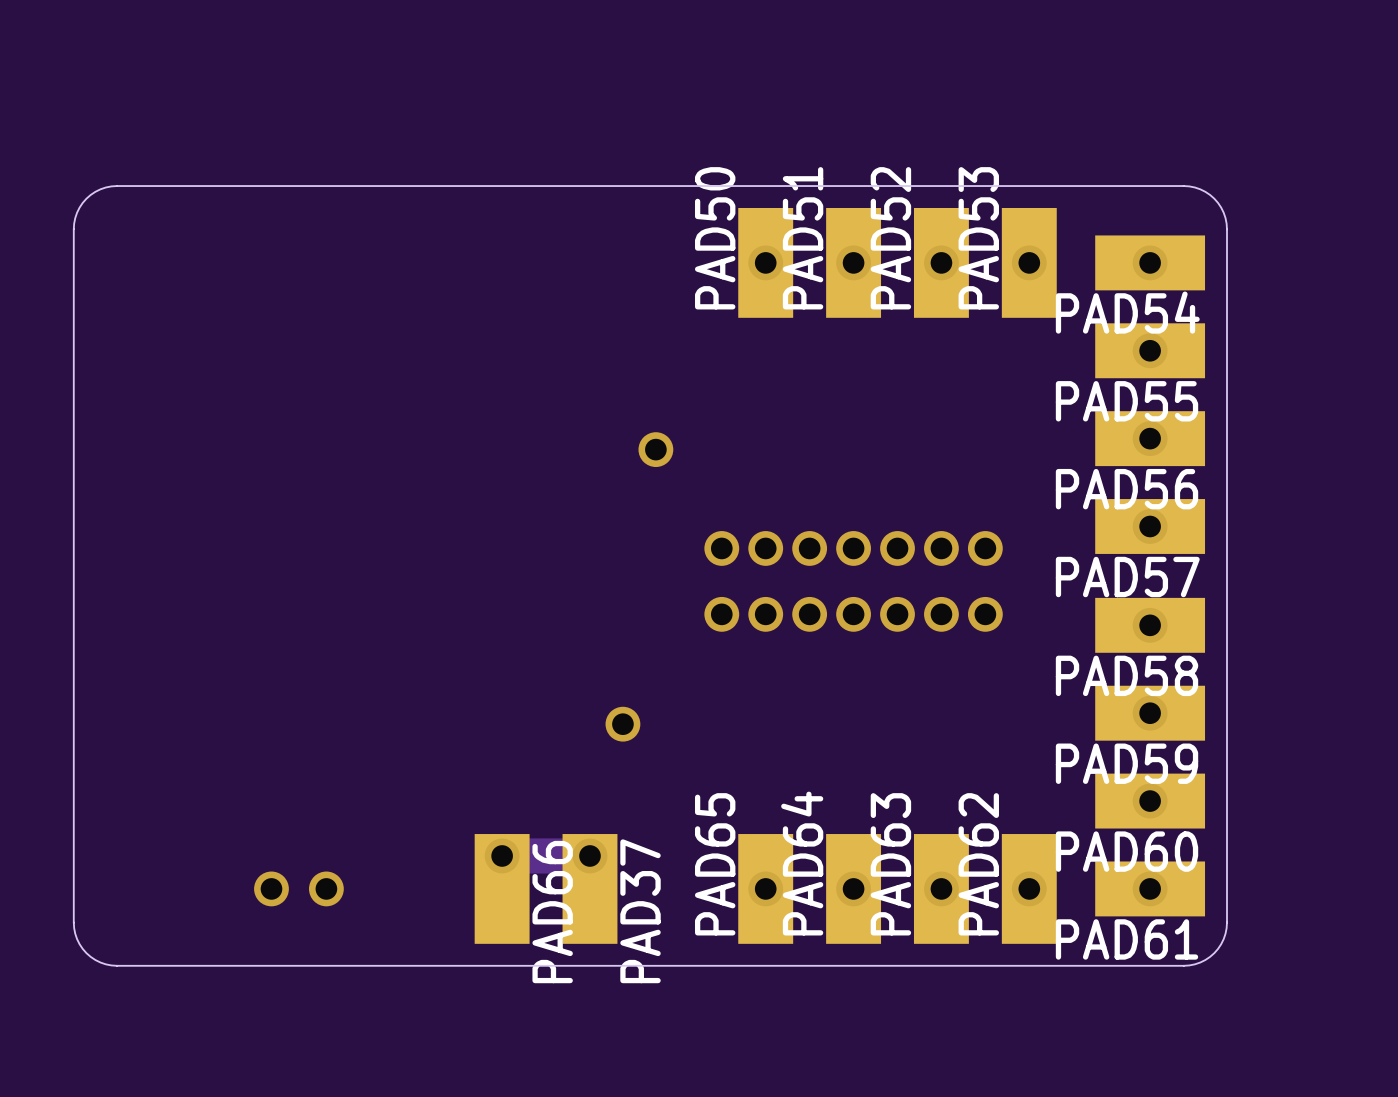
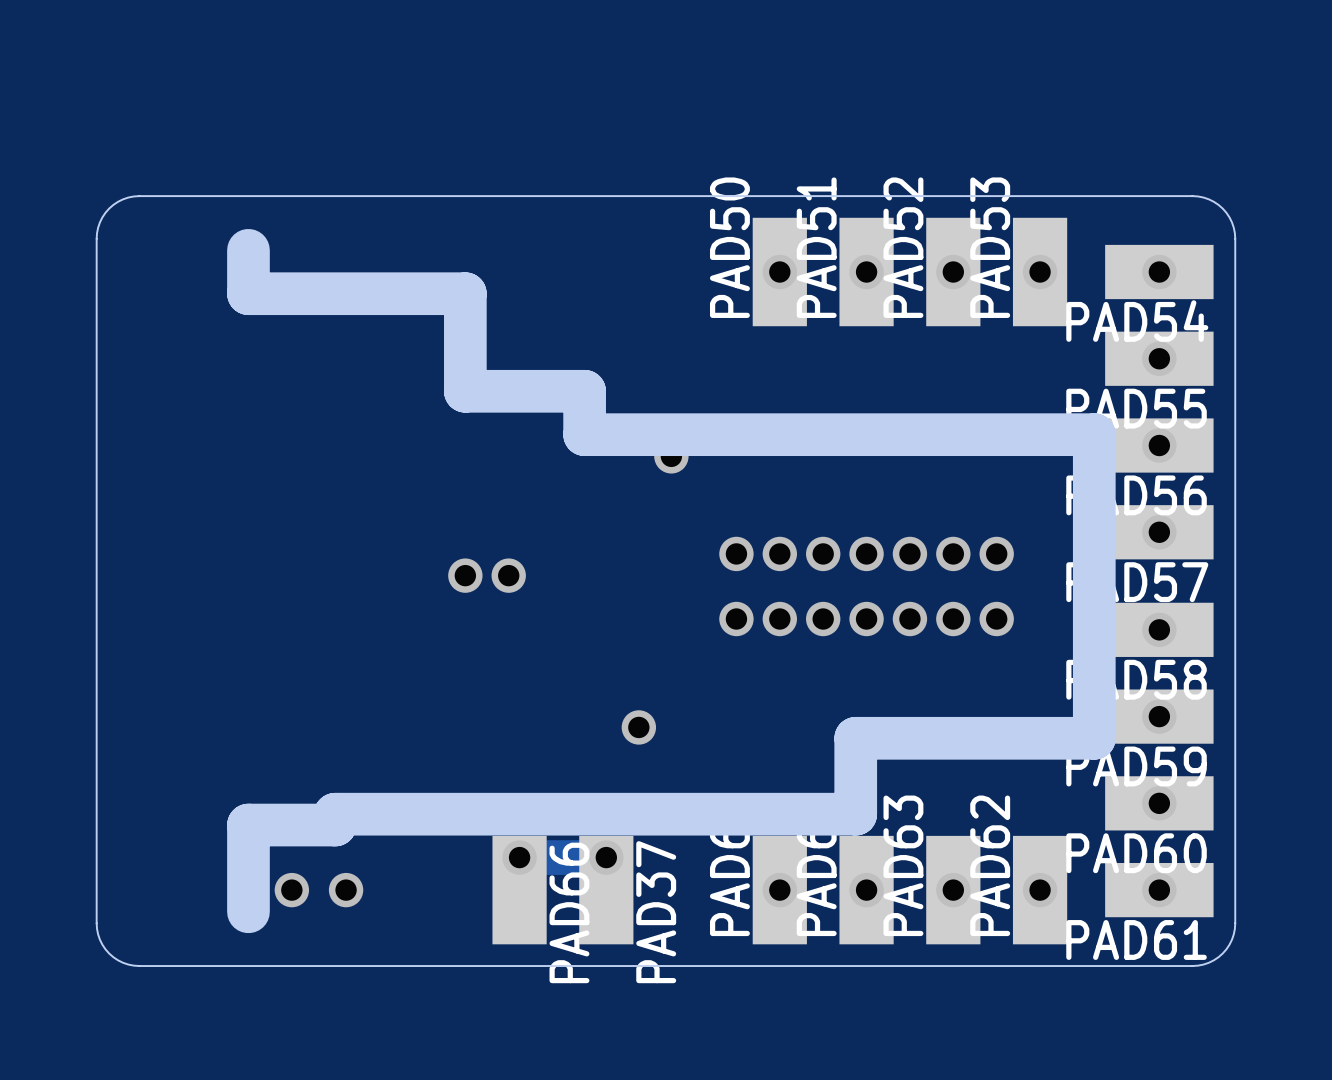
board edge: none -> (248, 250) (248, 293) (465, 293) (465, 391) (584, 391) (584, 434) (1094, 434) (1094, 738) (855, 738) (855, 814) (335, 814) (335, 825) (248, 825) (248, 911)
via: none -> (465, 575)
via: none -> (508, 575)

